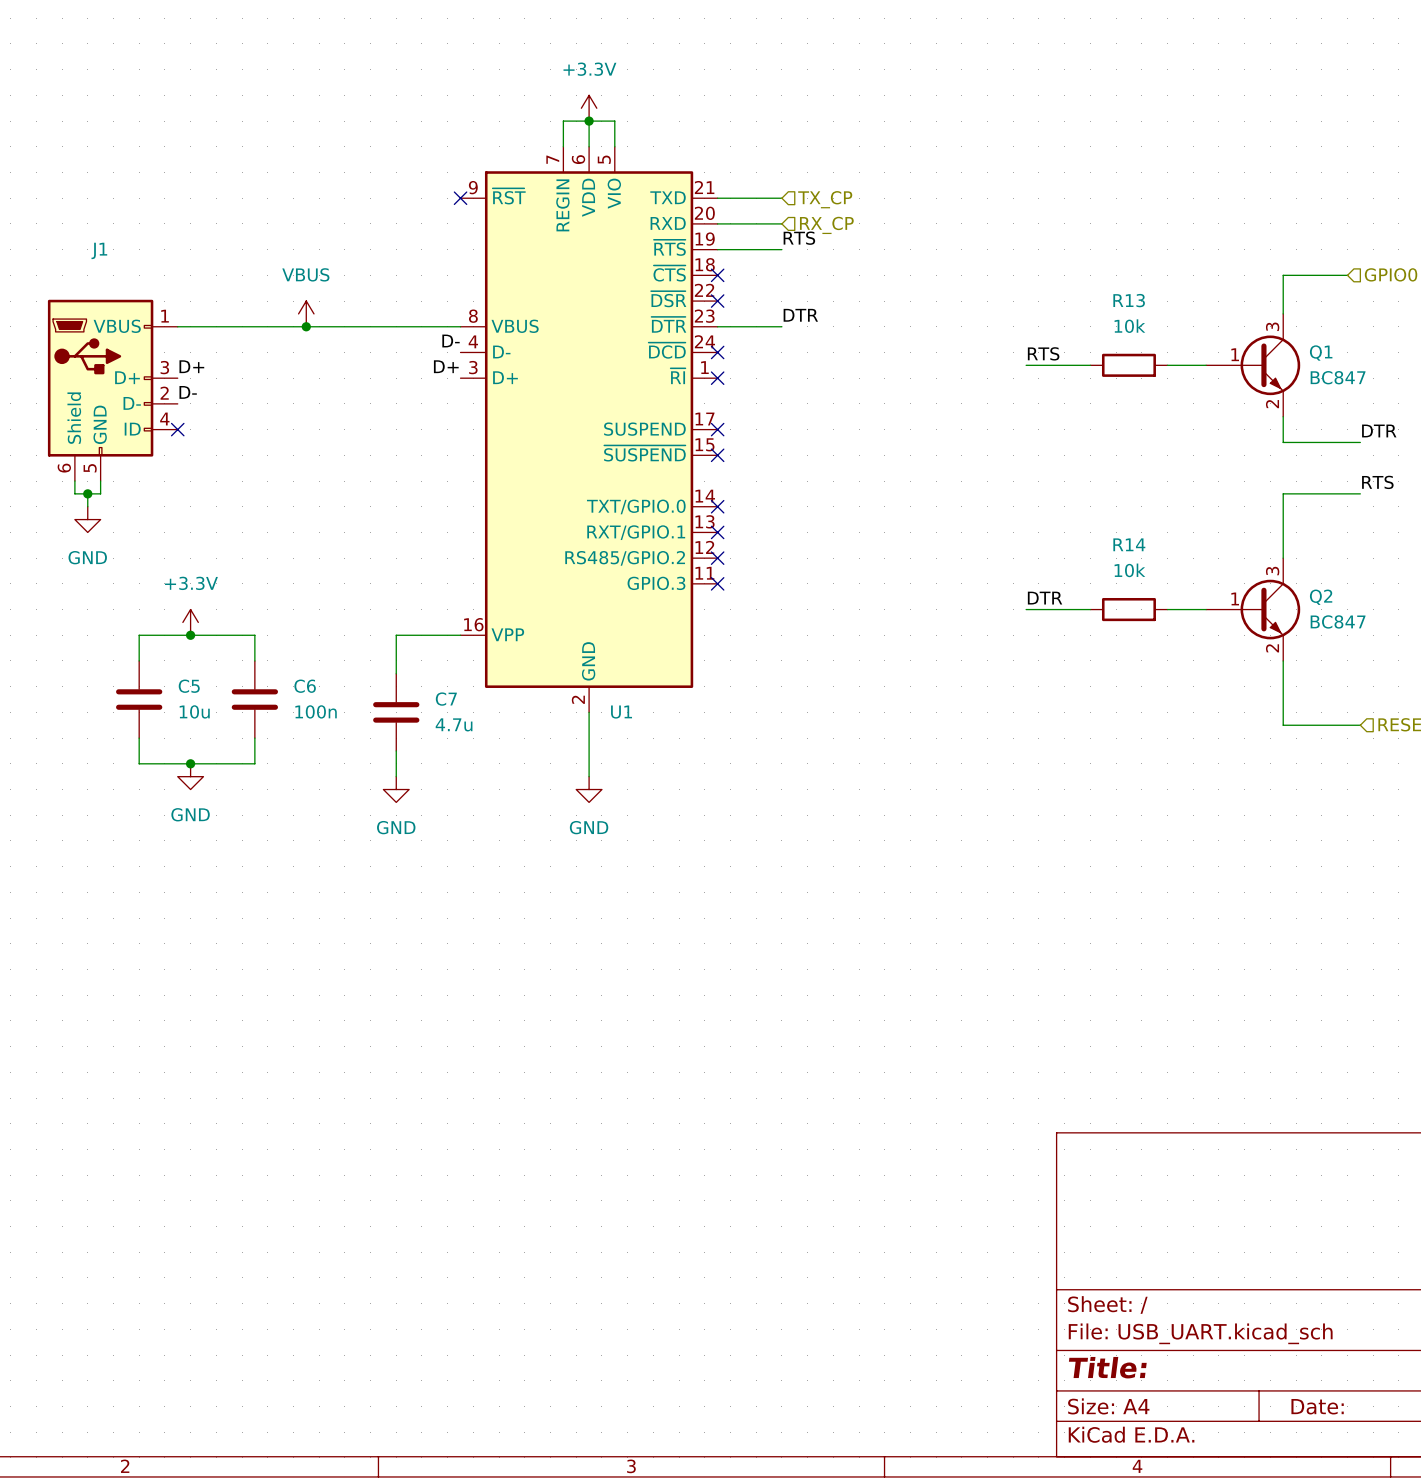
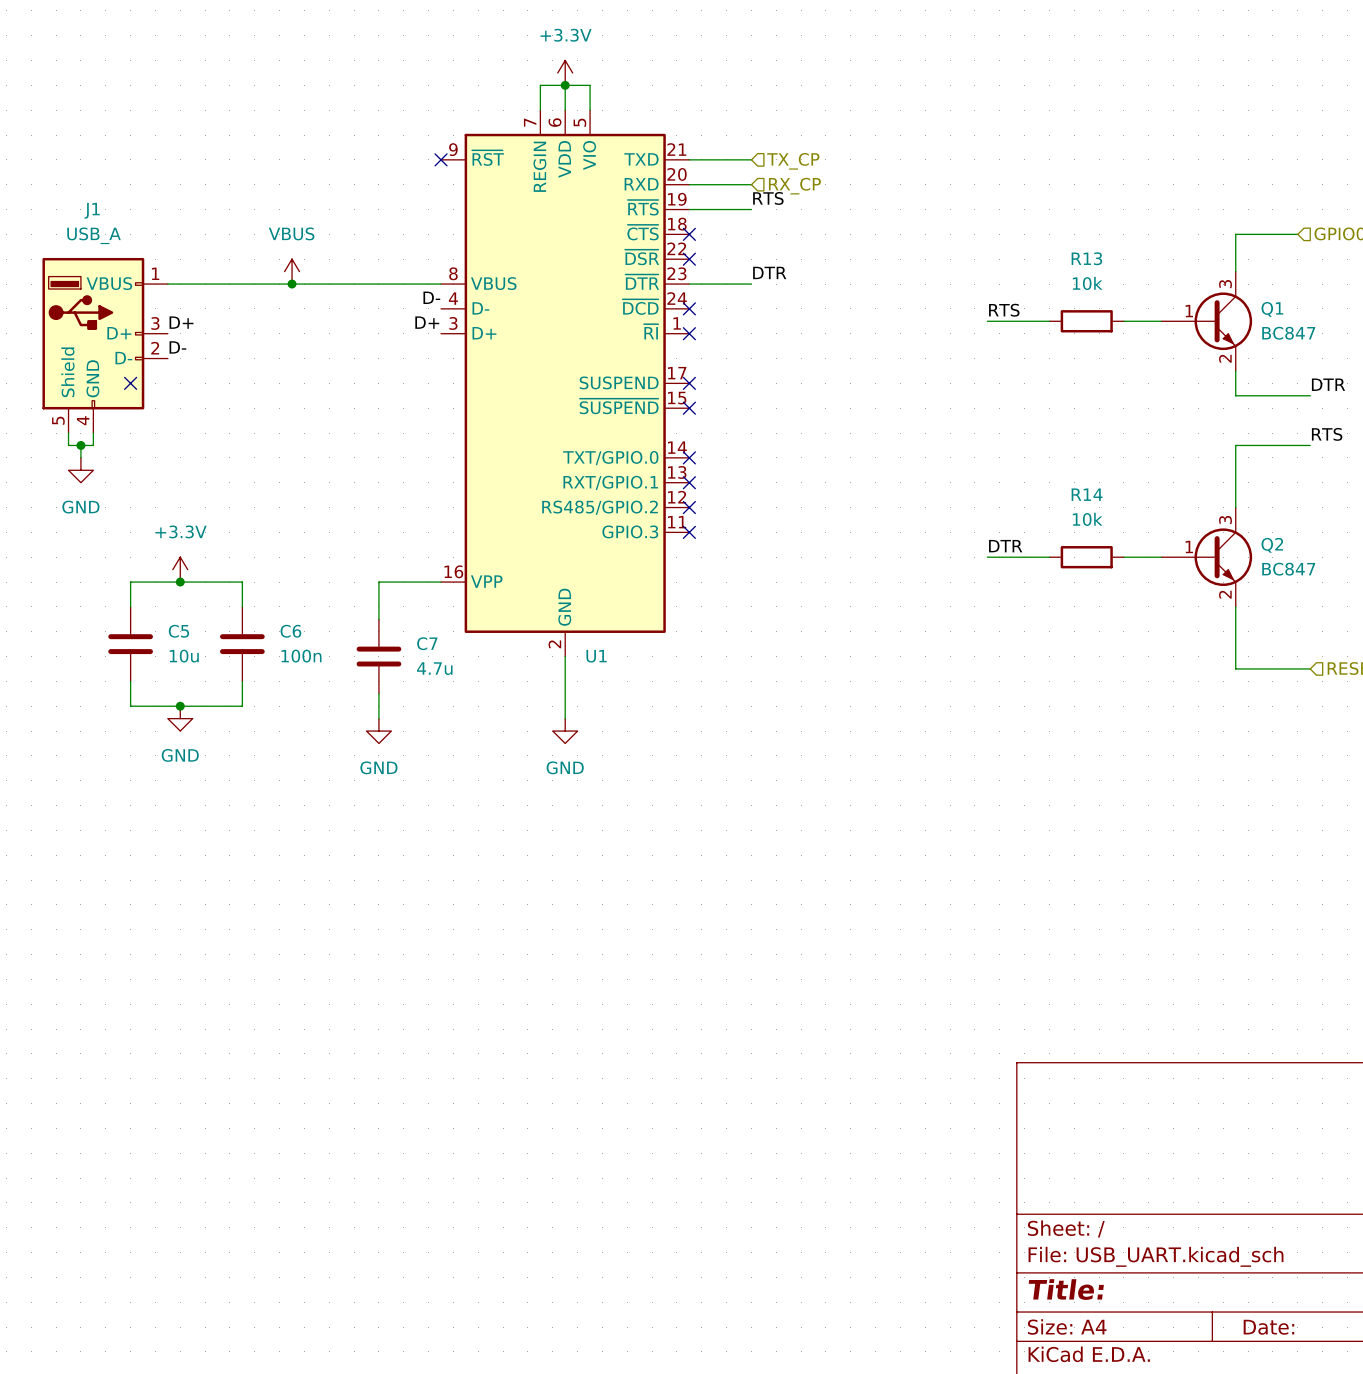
J1 value: none -> USB_A (94, 235)
J1 symbol: [47, 299, 178, 482] -> [42, 257, 168, 434]
no-connect mark position: (177, 429) -> (130, 383)

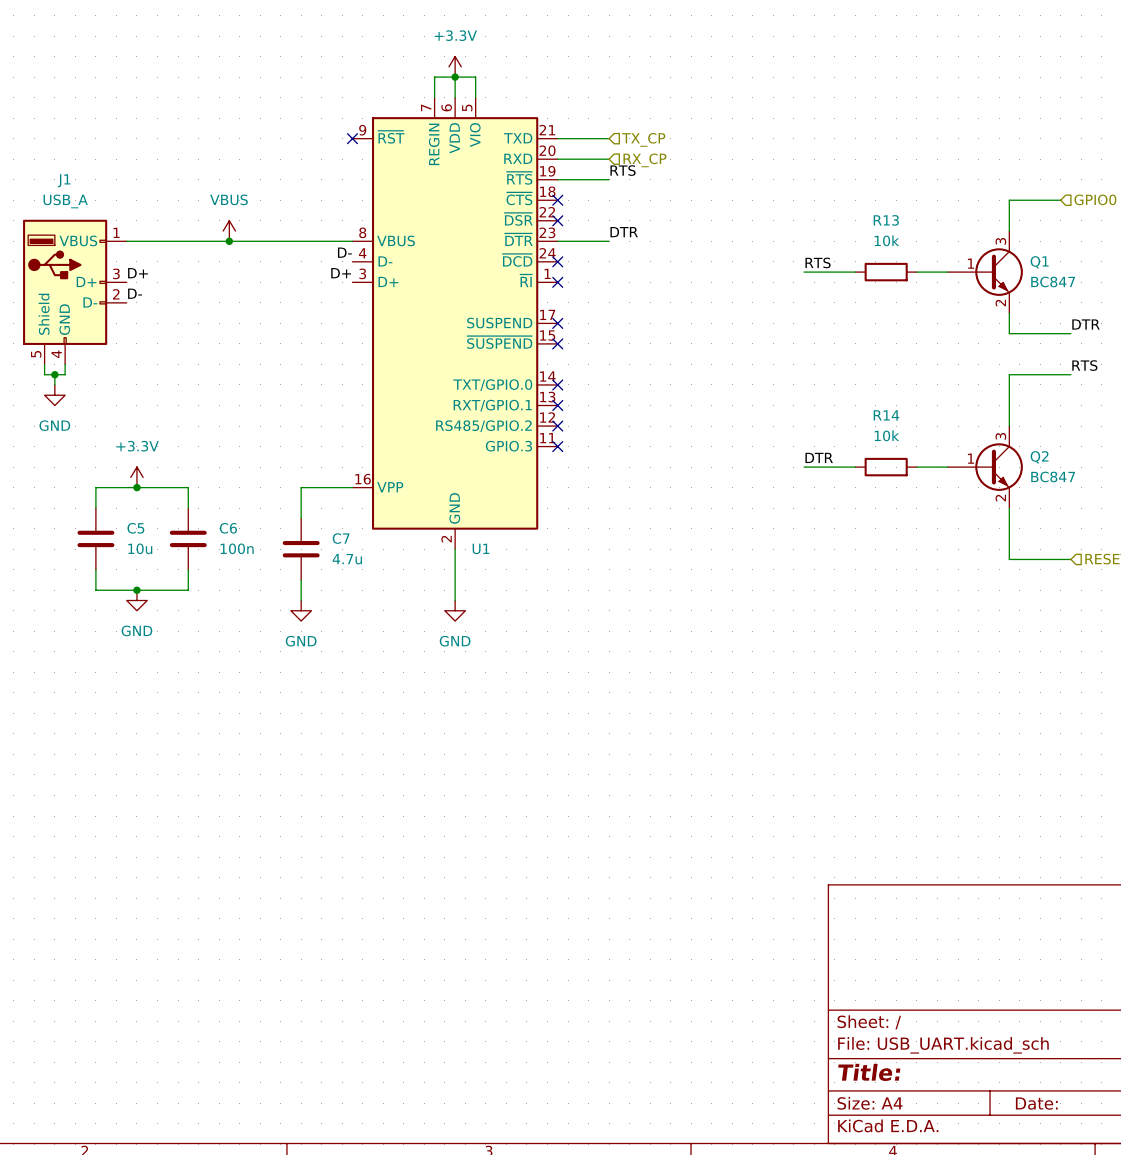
no-connect mark: (130, 383) -> none

